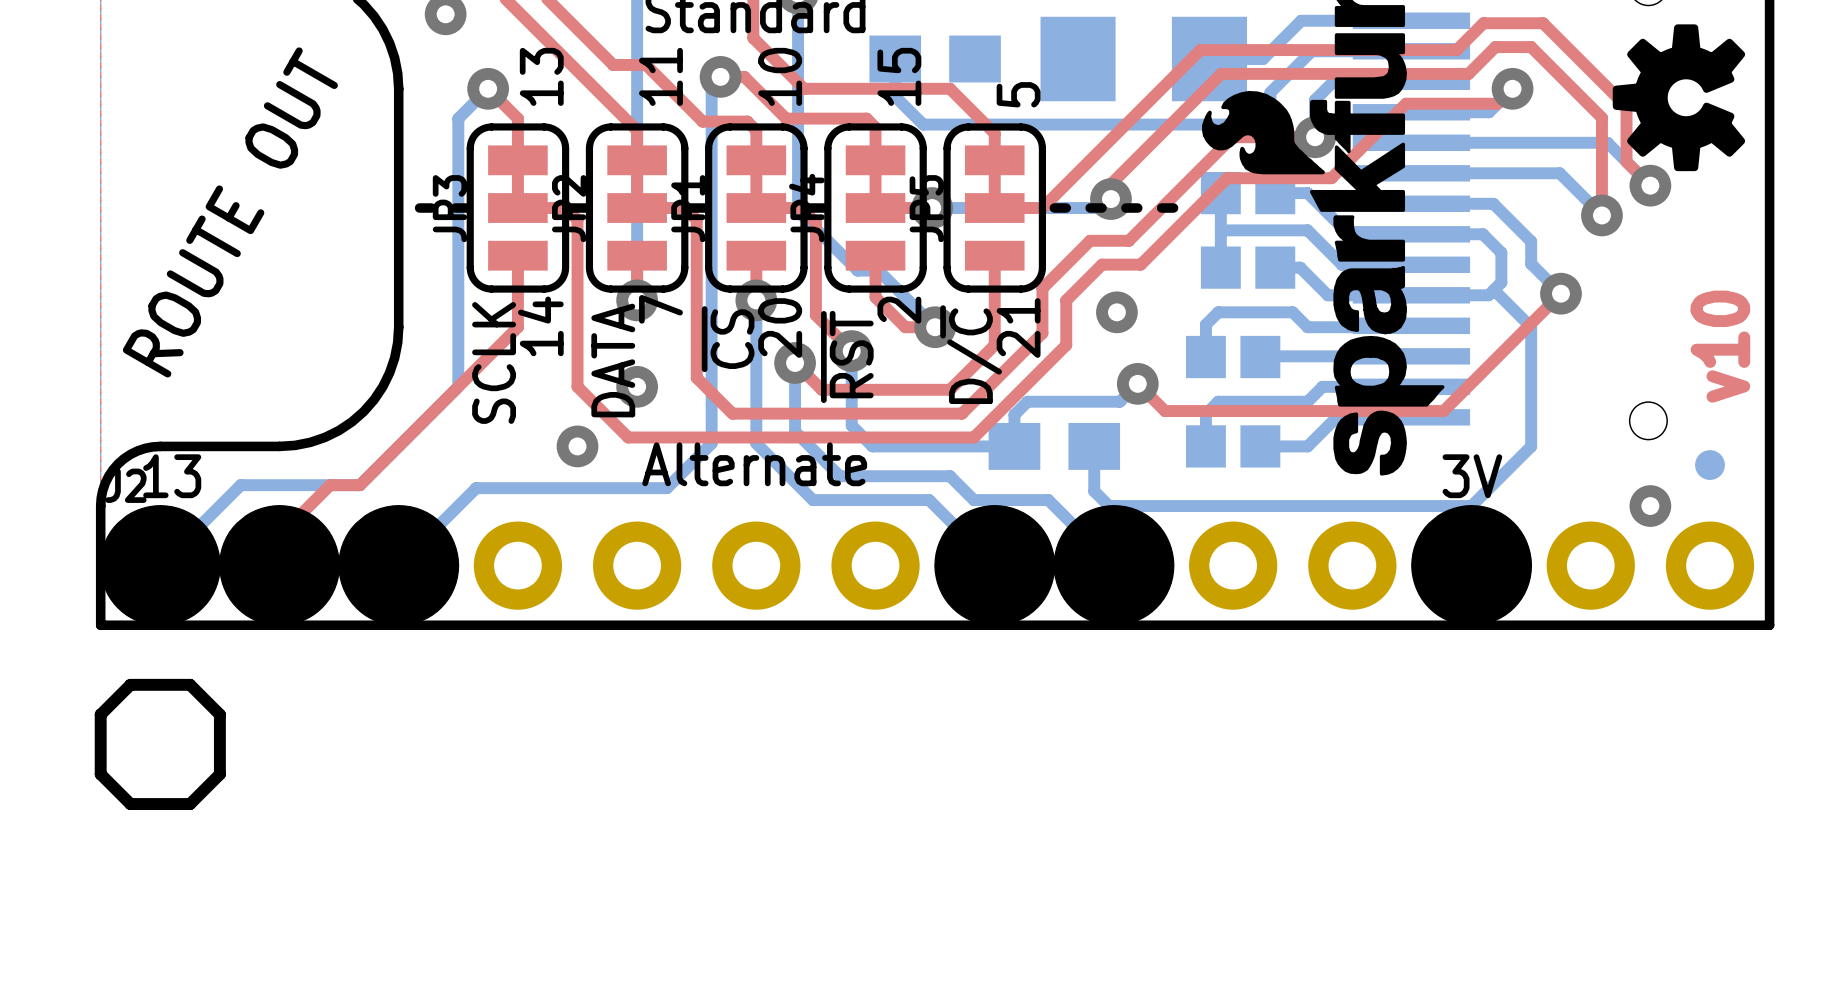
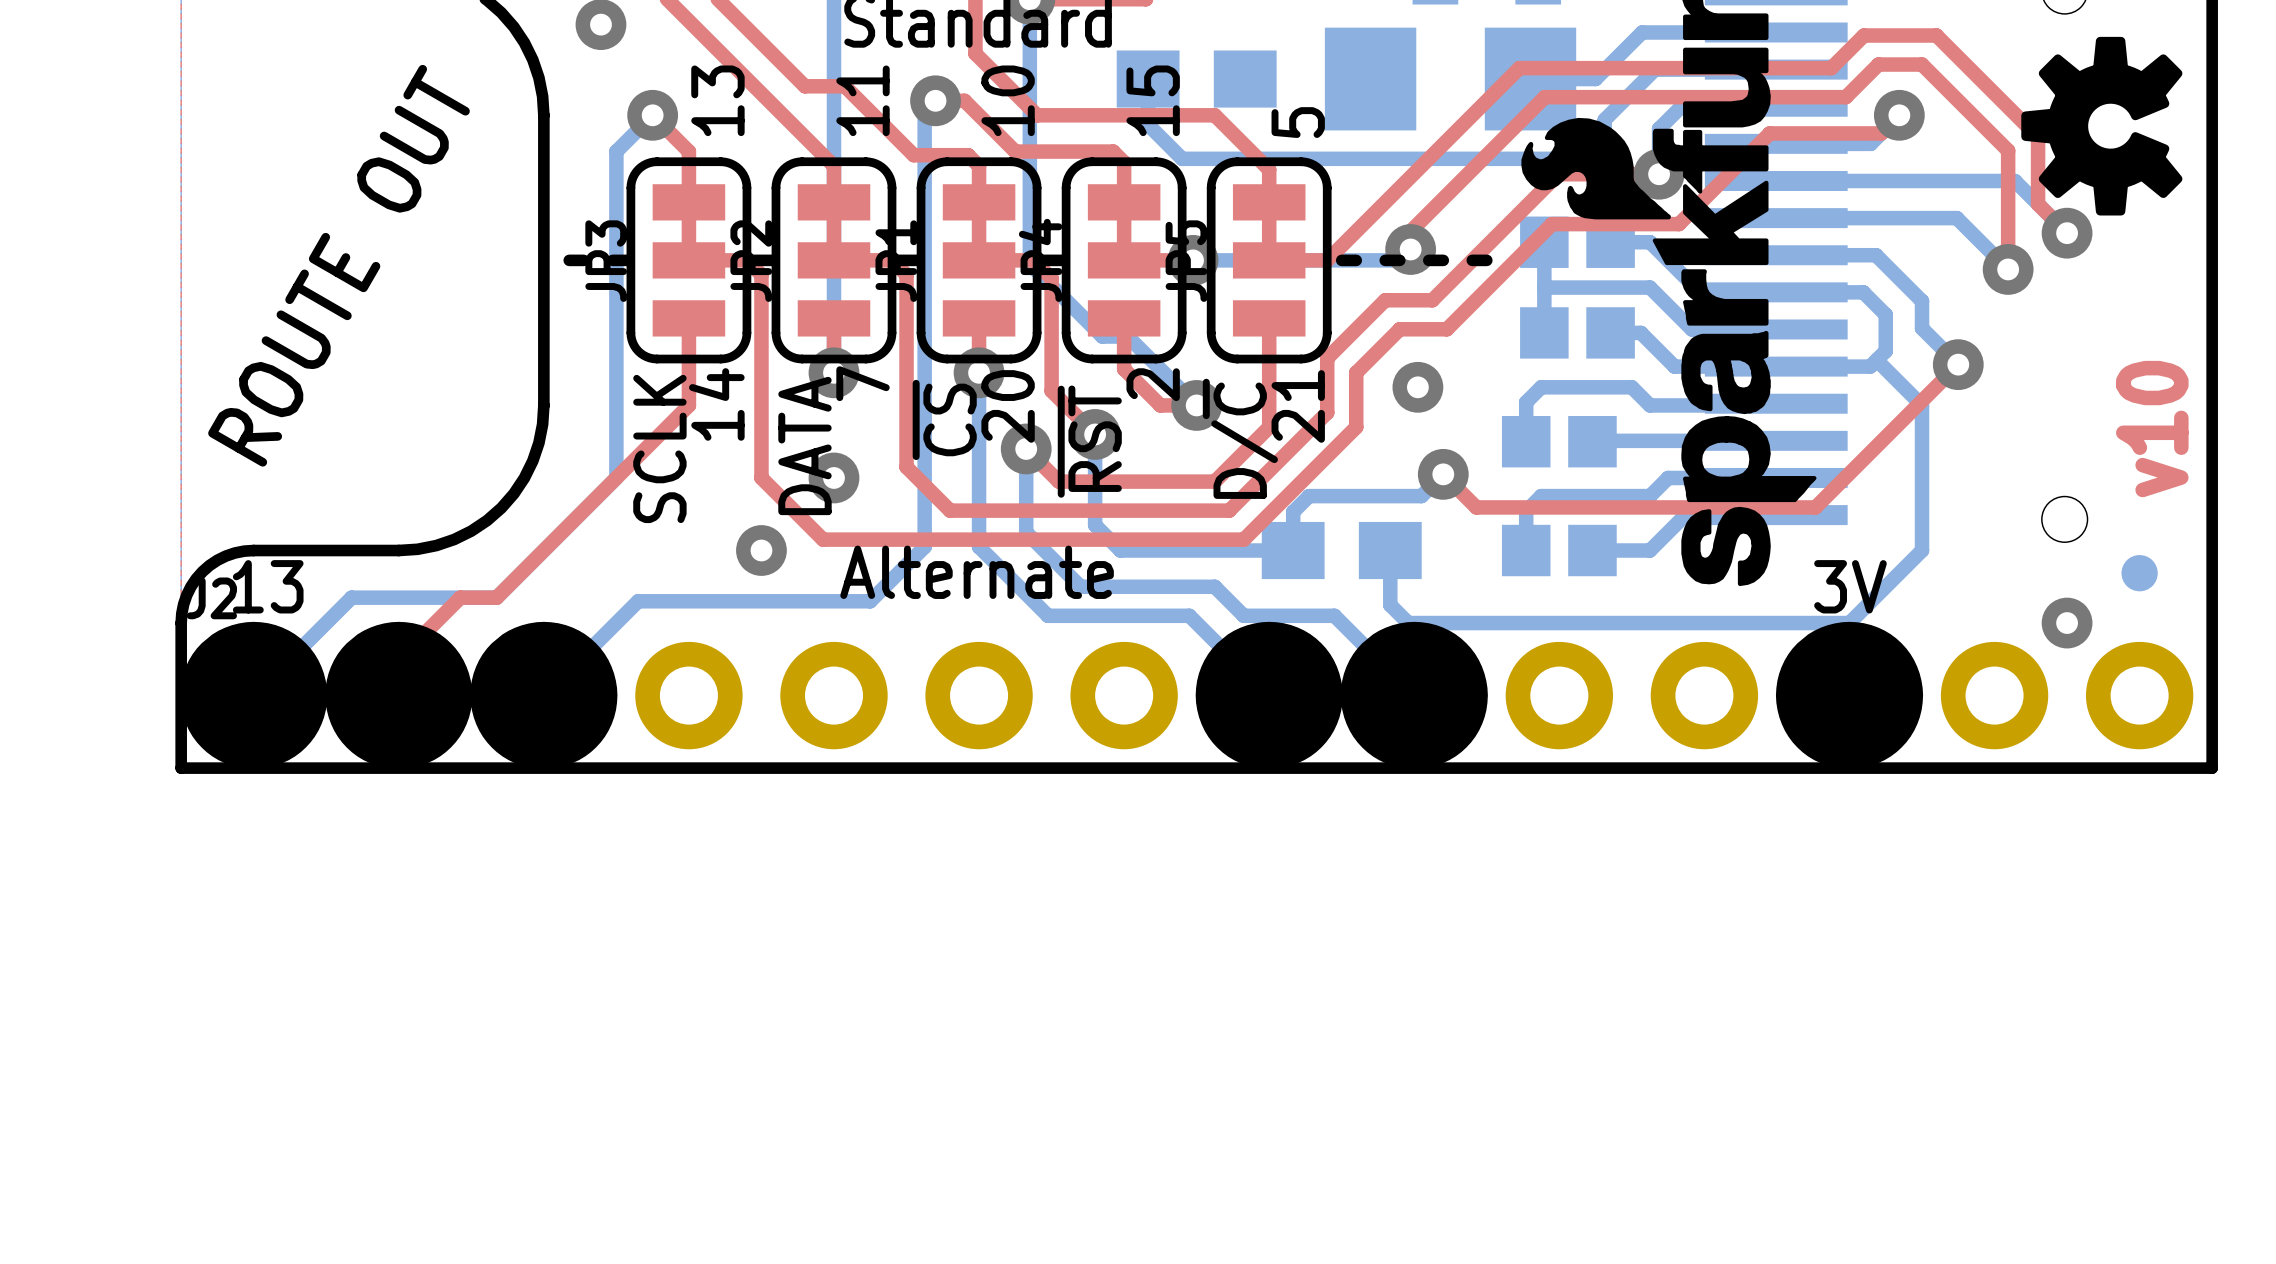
line: (130, 684) (100, 714) (100, 774) (130, 804) (190, 804) (219, 774) (219, 714) (190, 684) (130, 684) -> none

